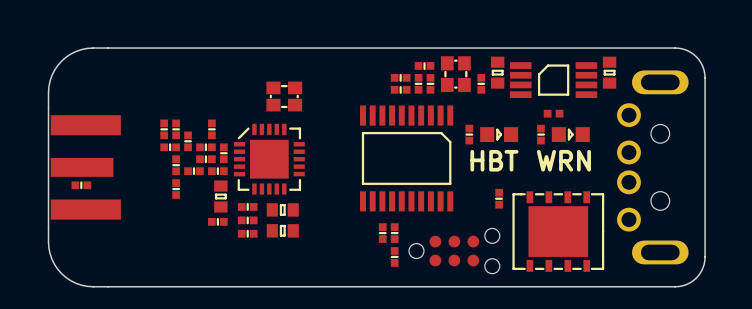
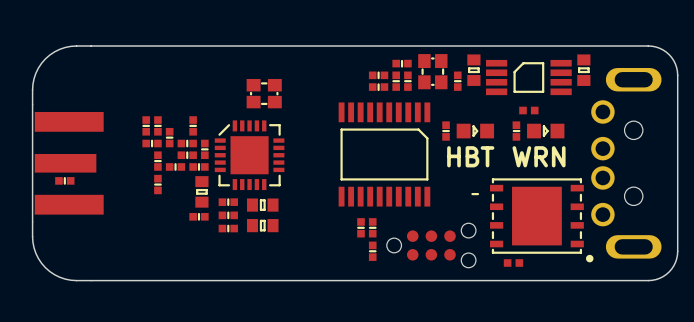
part footprint: [512, 191, 605, 272] -> [490, 178, 584, 254]
part rotation: 0° (499, 198) -> 90° clockwise (513, 262)
part position: (499, 198) -> (513, 262)
drawing: none -> [585, 254, 594, 263]

